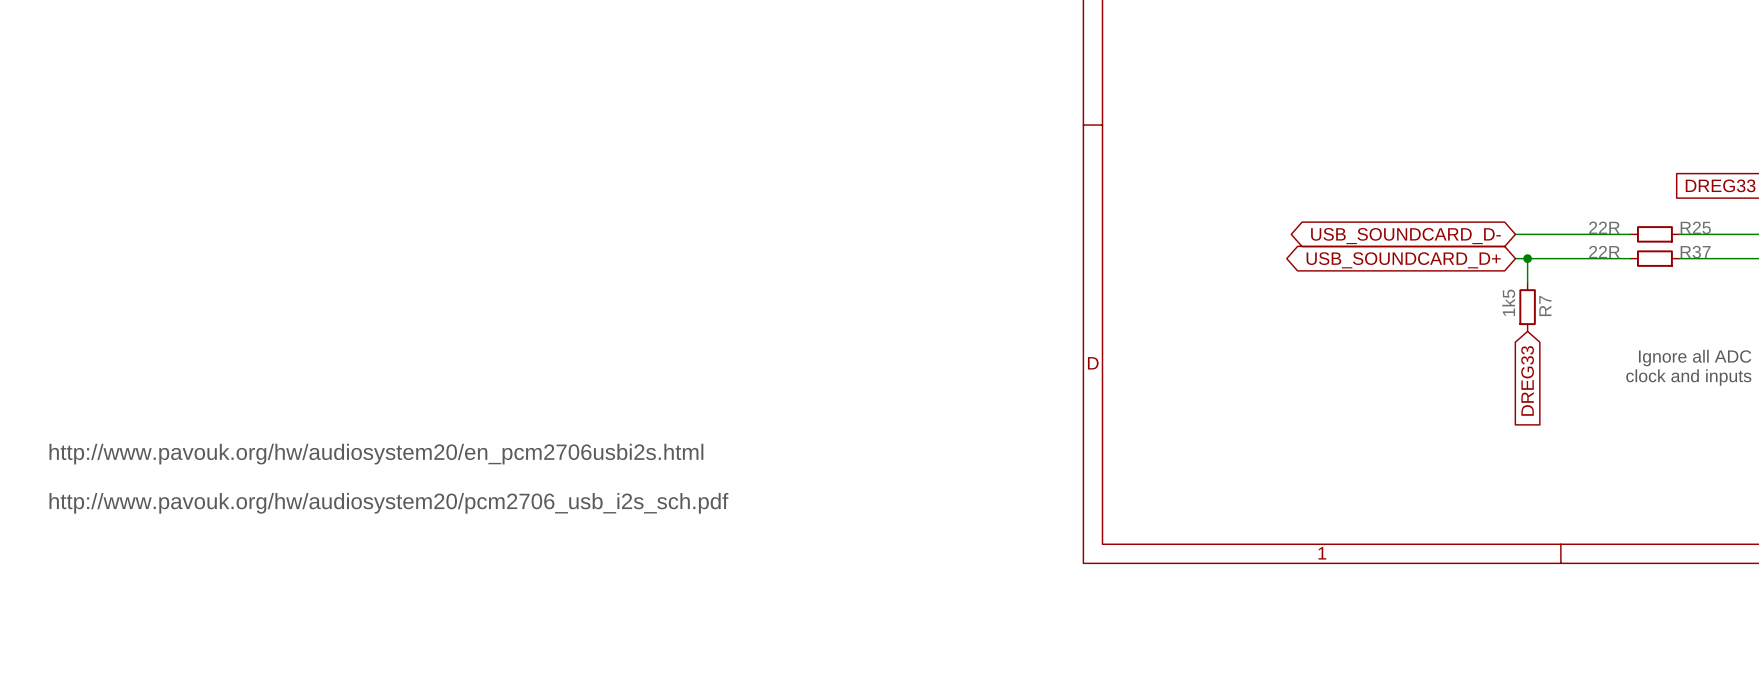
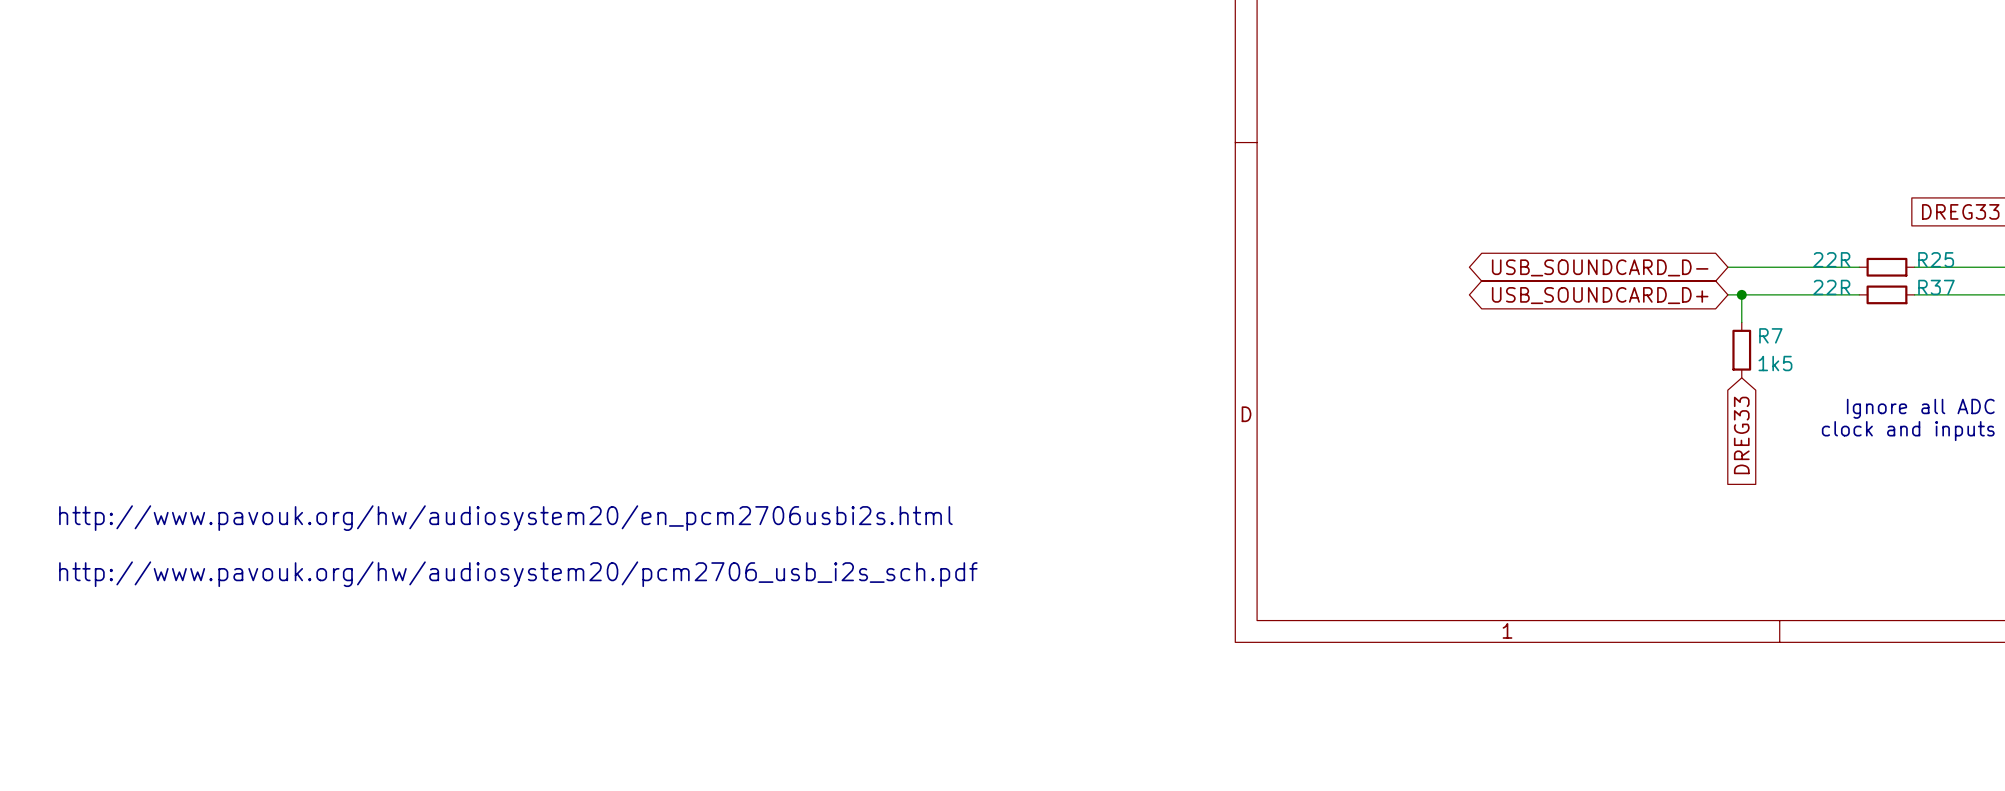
R7 value rotation: 0° (1508, 302) -> 90° clockwise (1775, 363)
R7 value position: 1k5 (1508, 302) -> 1k5 (1775, 363)
R7 name rotation: 0° (1545, 306) -> 90° clockwise (1770, 335)

